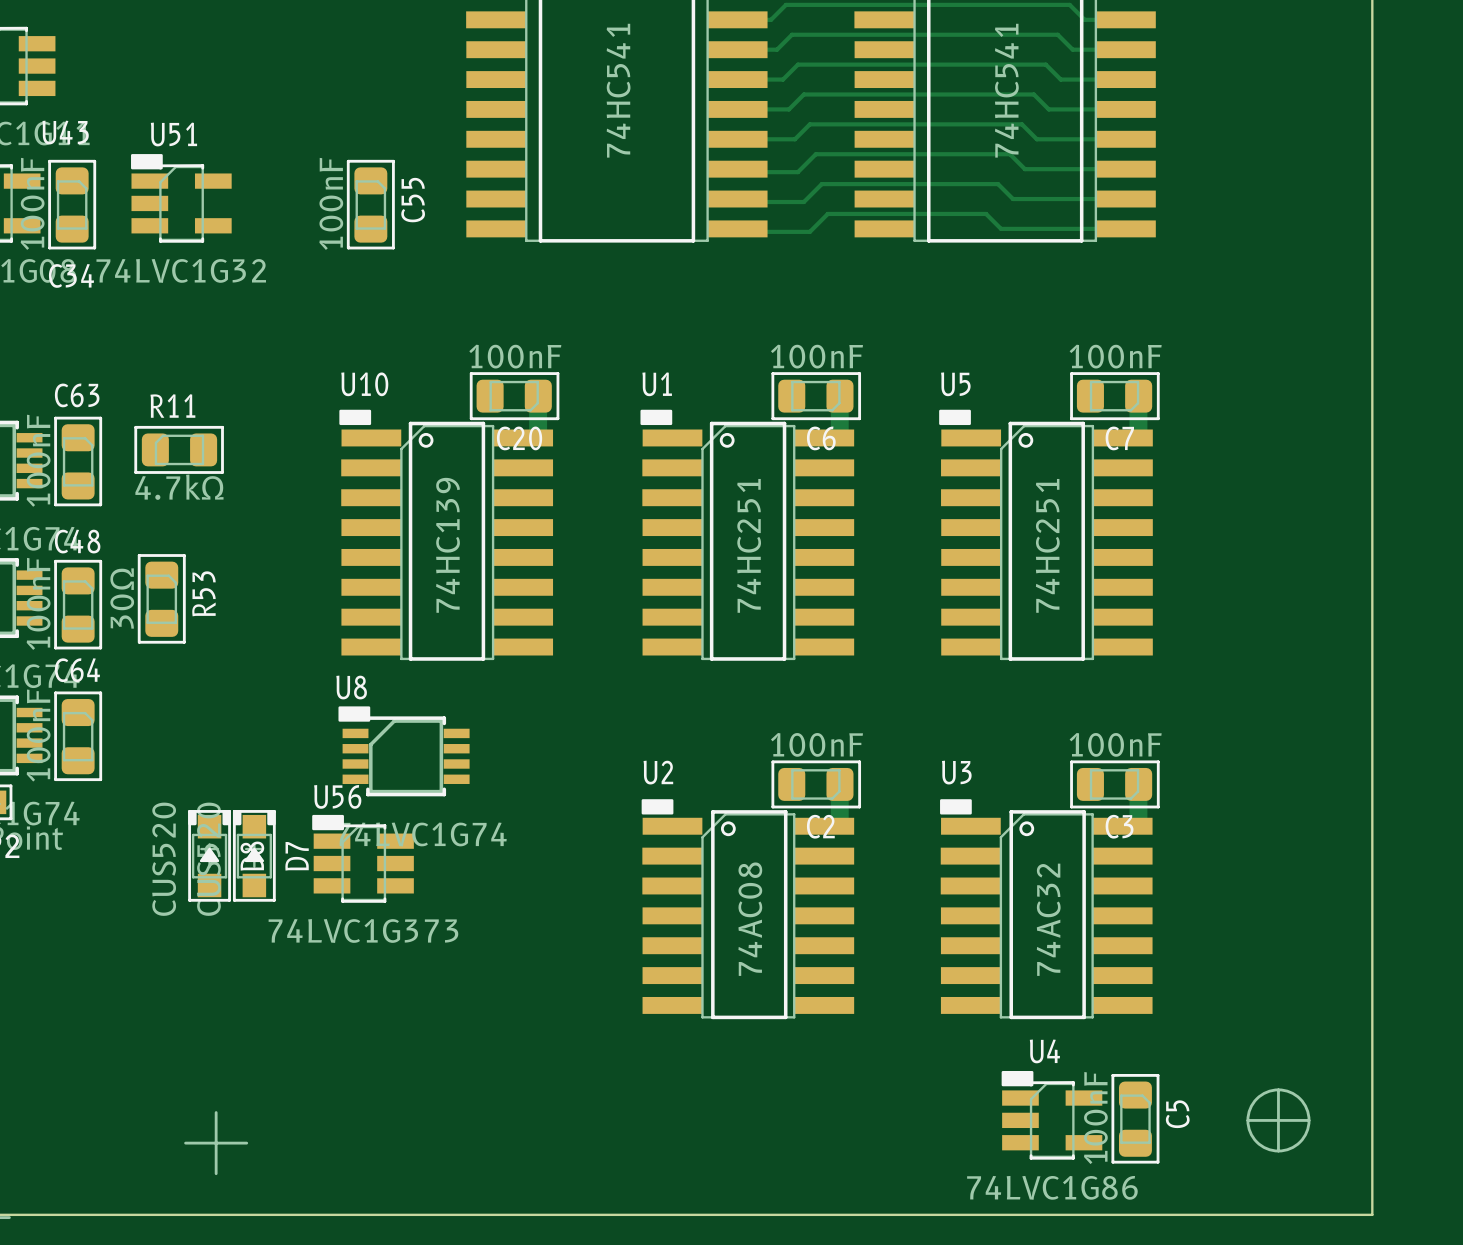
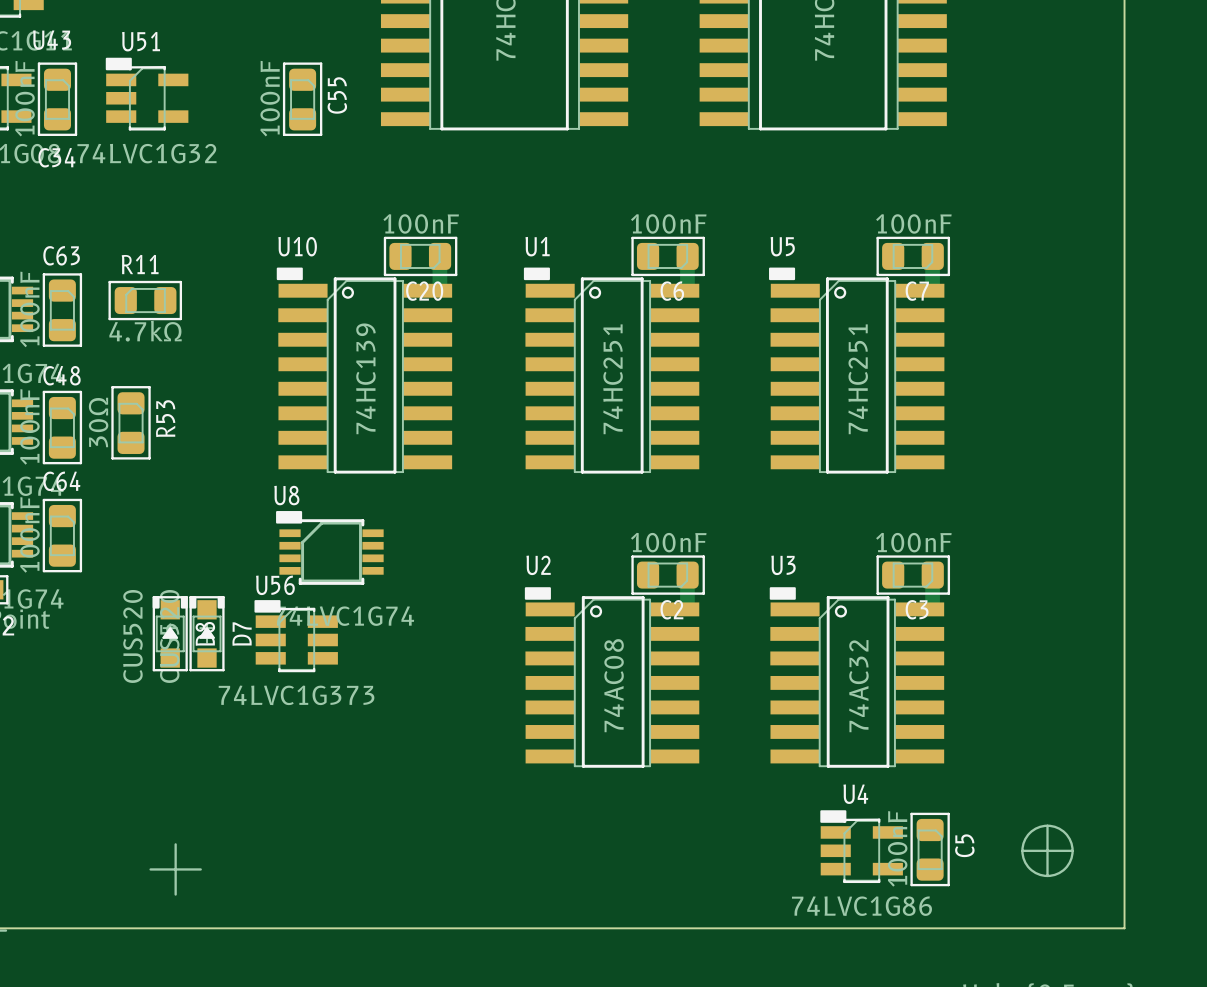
track: (738, 109) (788, 109) (803, 94) (1033, 94) (1048, 109) (1126, 109) -> none
track: (738, 139) (794, 139) (809, 124) (1021, 124) (1036, 139) (1126, 139) -> none
track: (1126, 169) (1024, 169) (1010, 154) (815, 154) (797, 172) (738, 172) -> none
track: (1126, 199) (1012, 199) (998, 184) (821, 184) (803, 202) (738, 202) -> none
track: (1126, 228) (1001, 228) (986, 213) (827, 213) (809, 231) (738, 231) -> none

